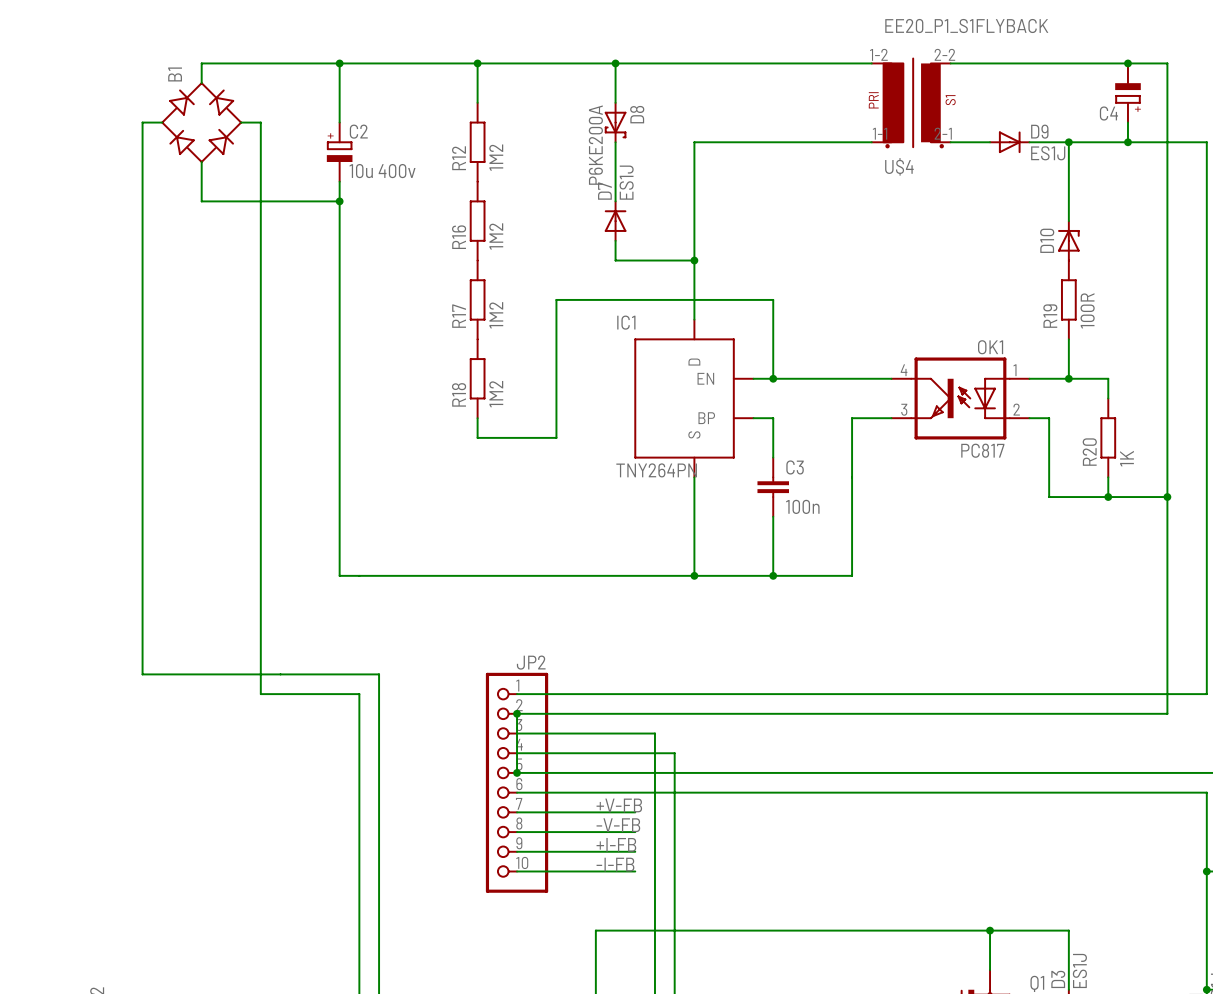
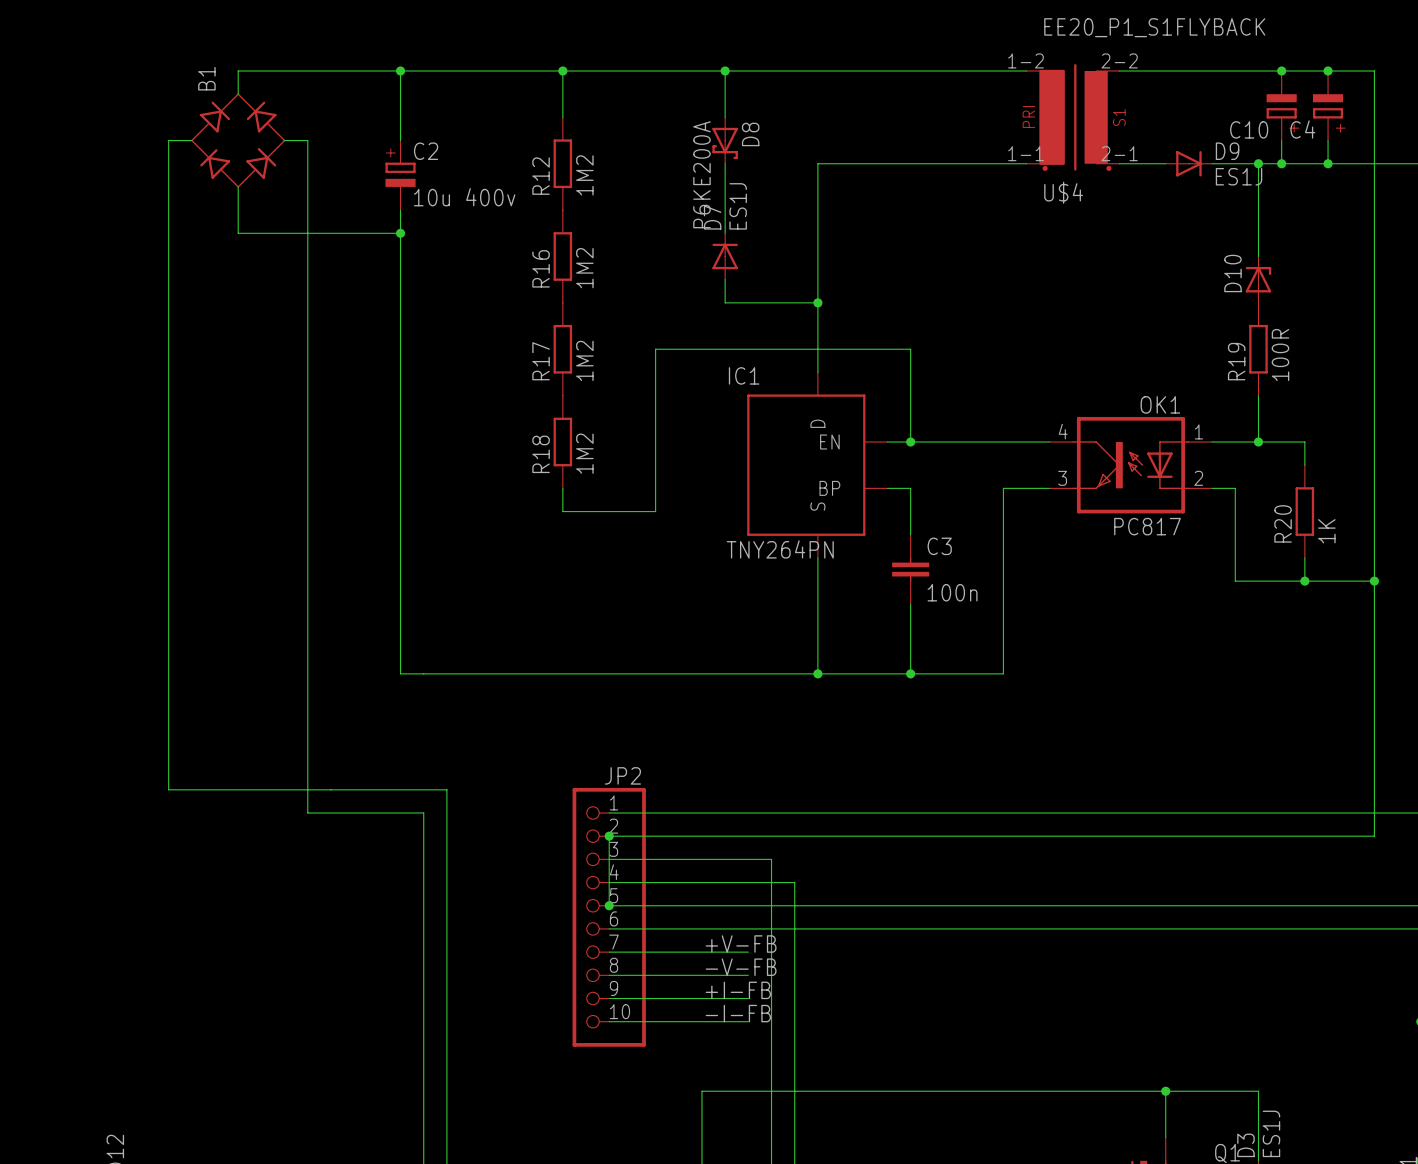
junction: none -> (1281, 70)
C10: none -> (1281, 105)
wire: none -> (1281, 140) (1281, 163)
junction: none -> (1281, 163)

